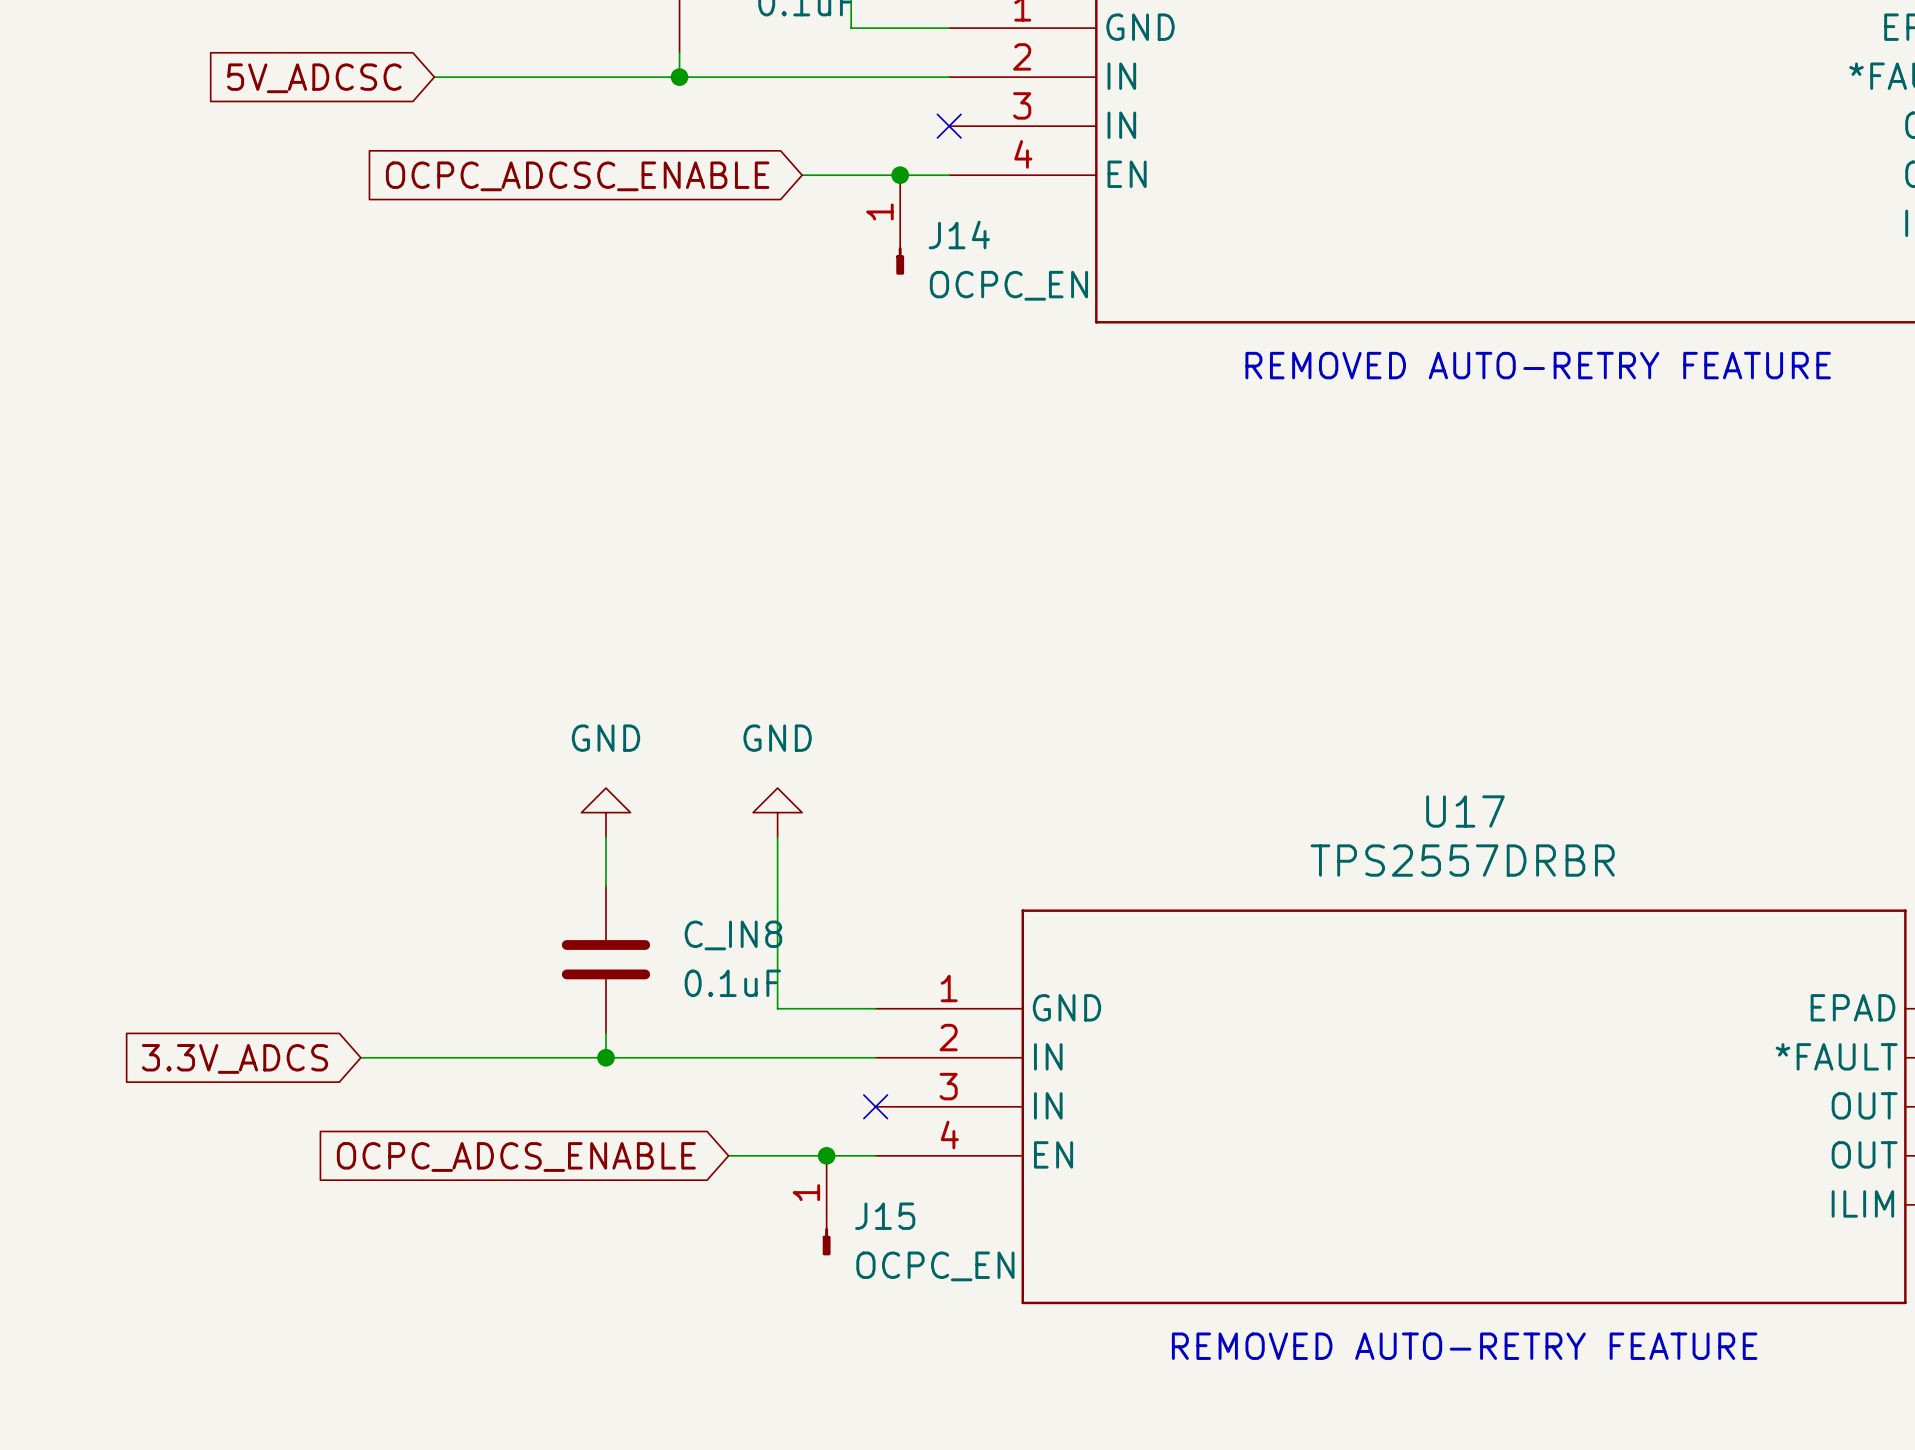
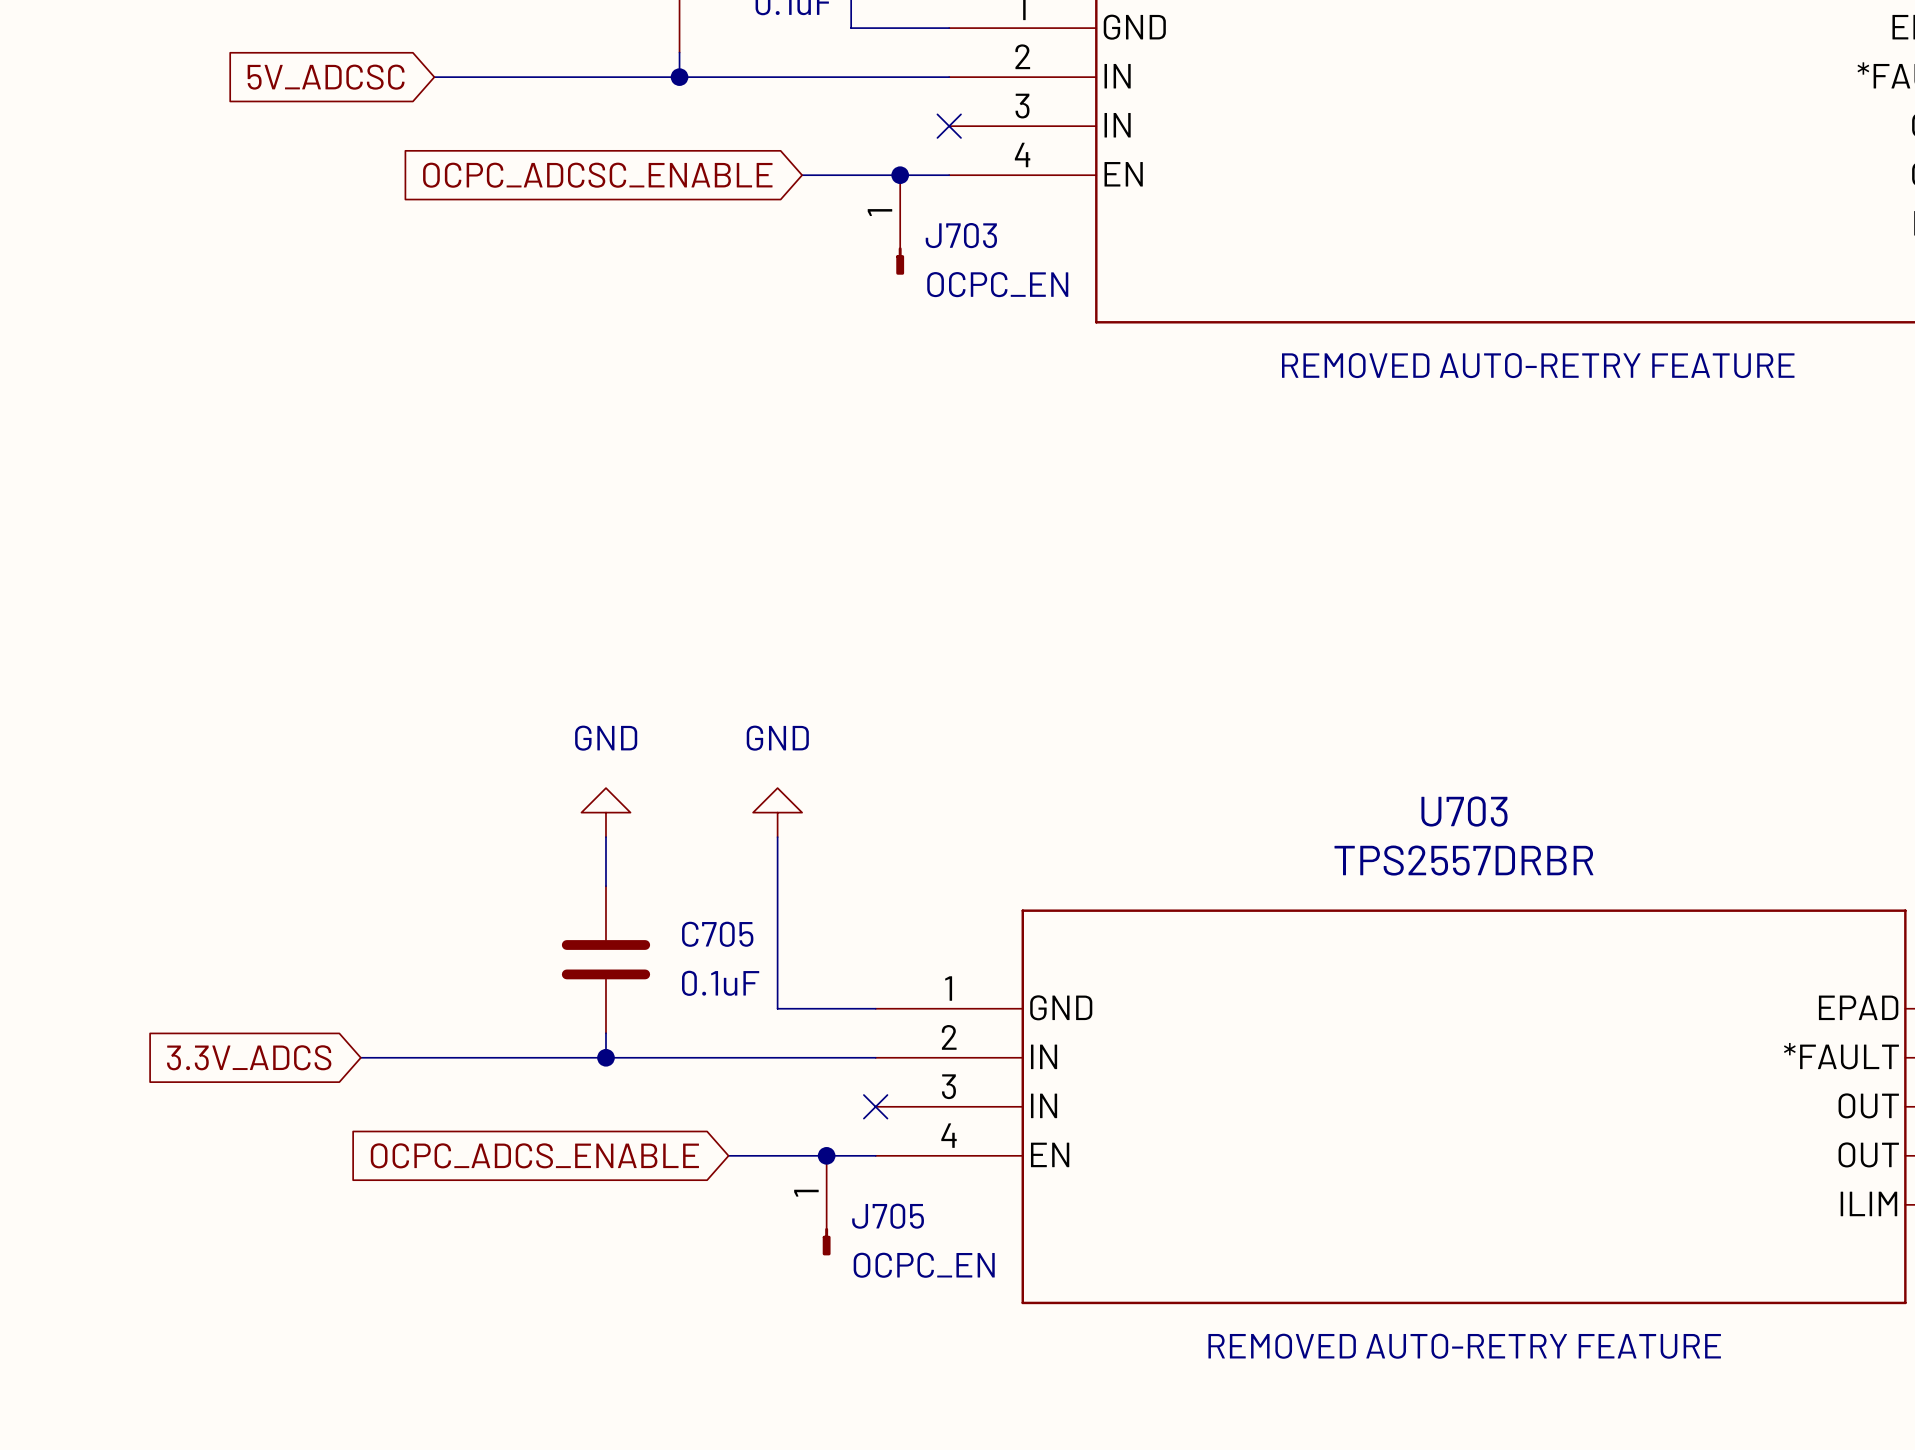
J14 name: J14 (959, 234) -> J703 (961, 235)
U17 name: U17 (1465, 811) -> U703 (1464, 811)
C_IN8 name: C_IN8 (733, 935) -> C705 (717, 934)
J15 name: J15 (885, 1216) -> J705 (888, 1216)

